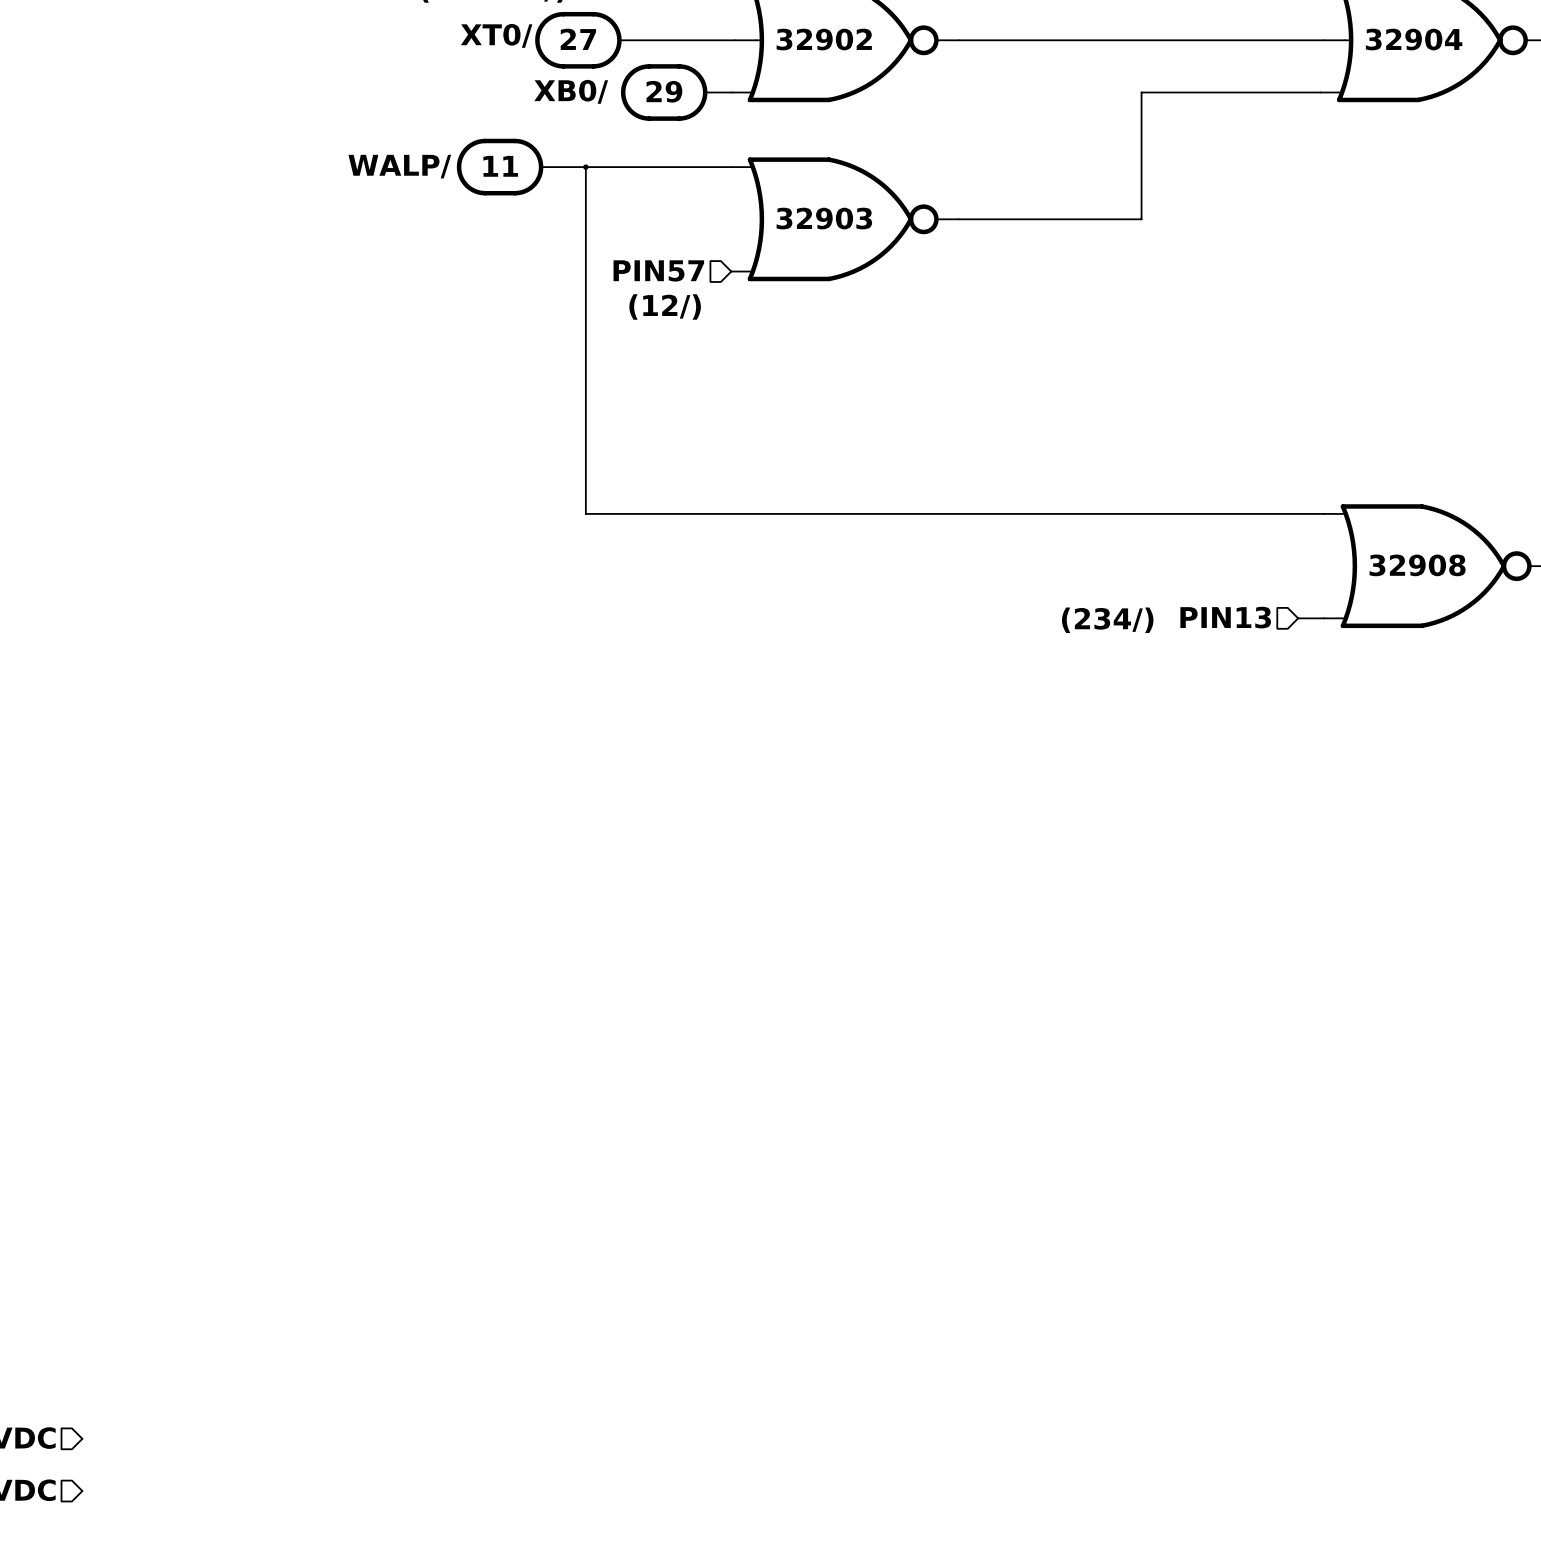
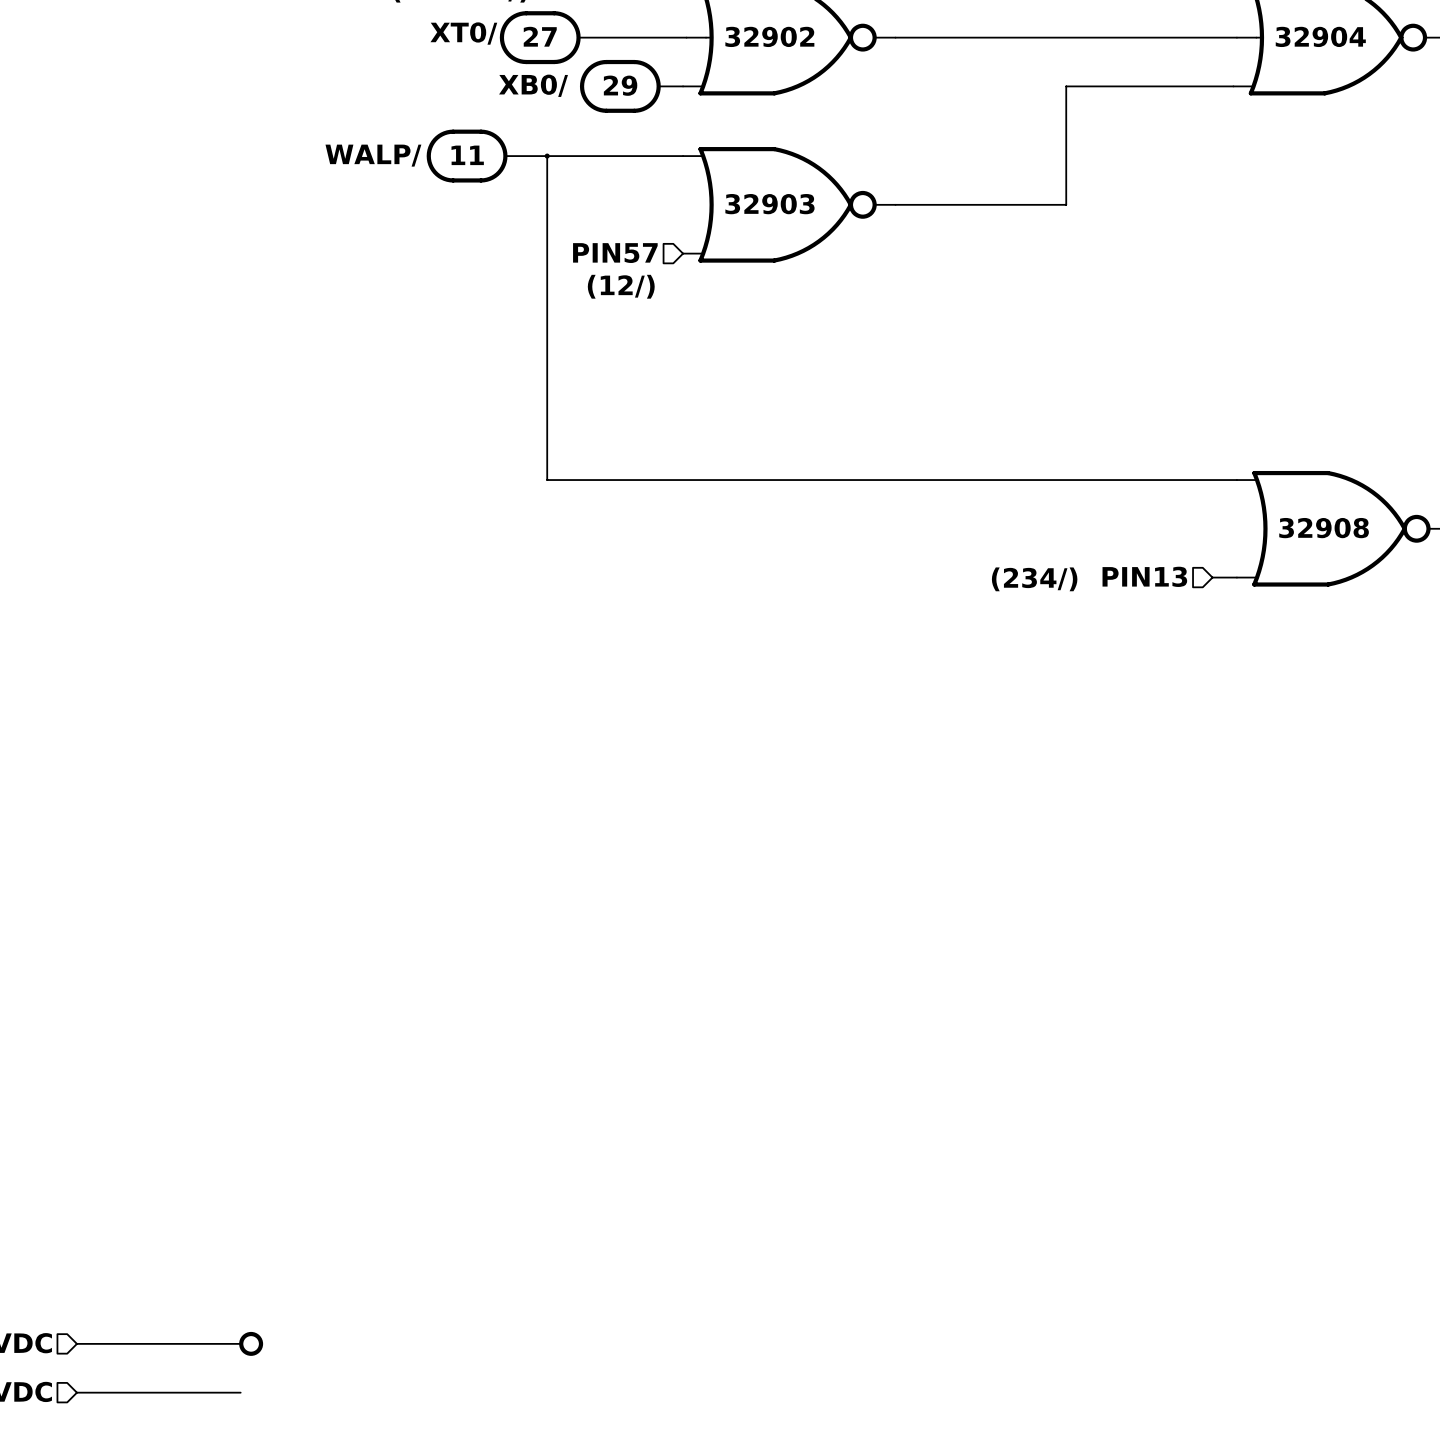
wire: none -> (76, 1343) (240, 1343)
part: none -> (251, 1343)
wire: none -> (76, 1392) (240, 1392)

